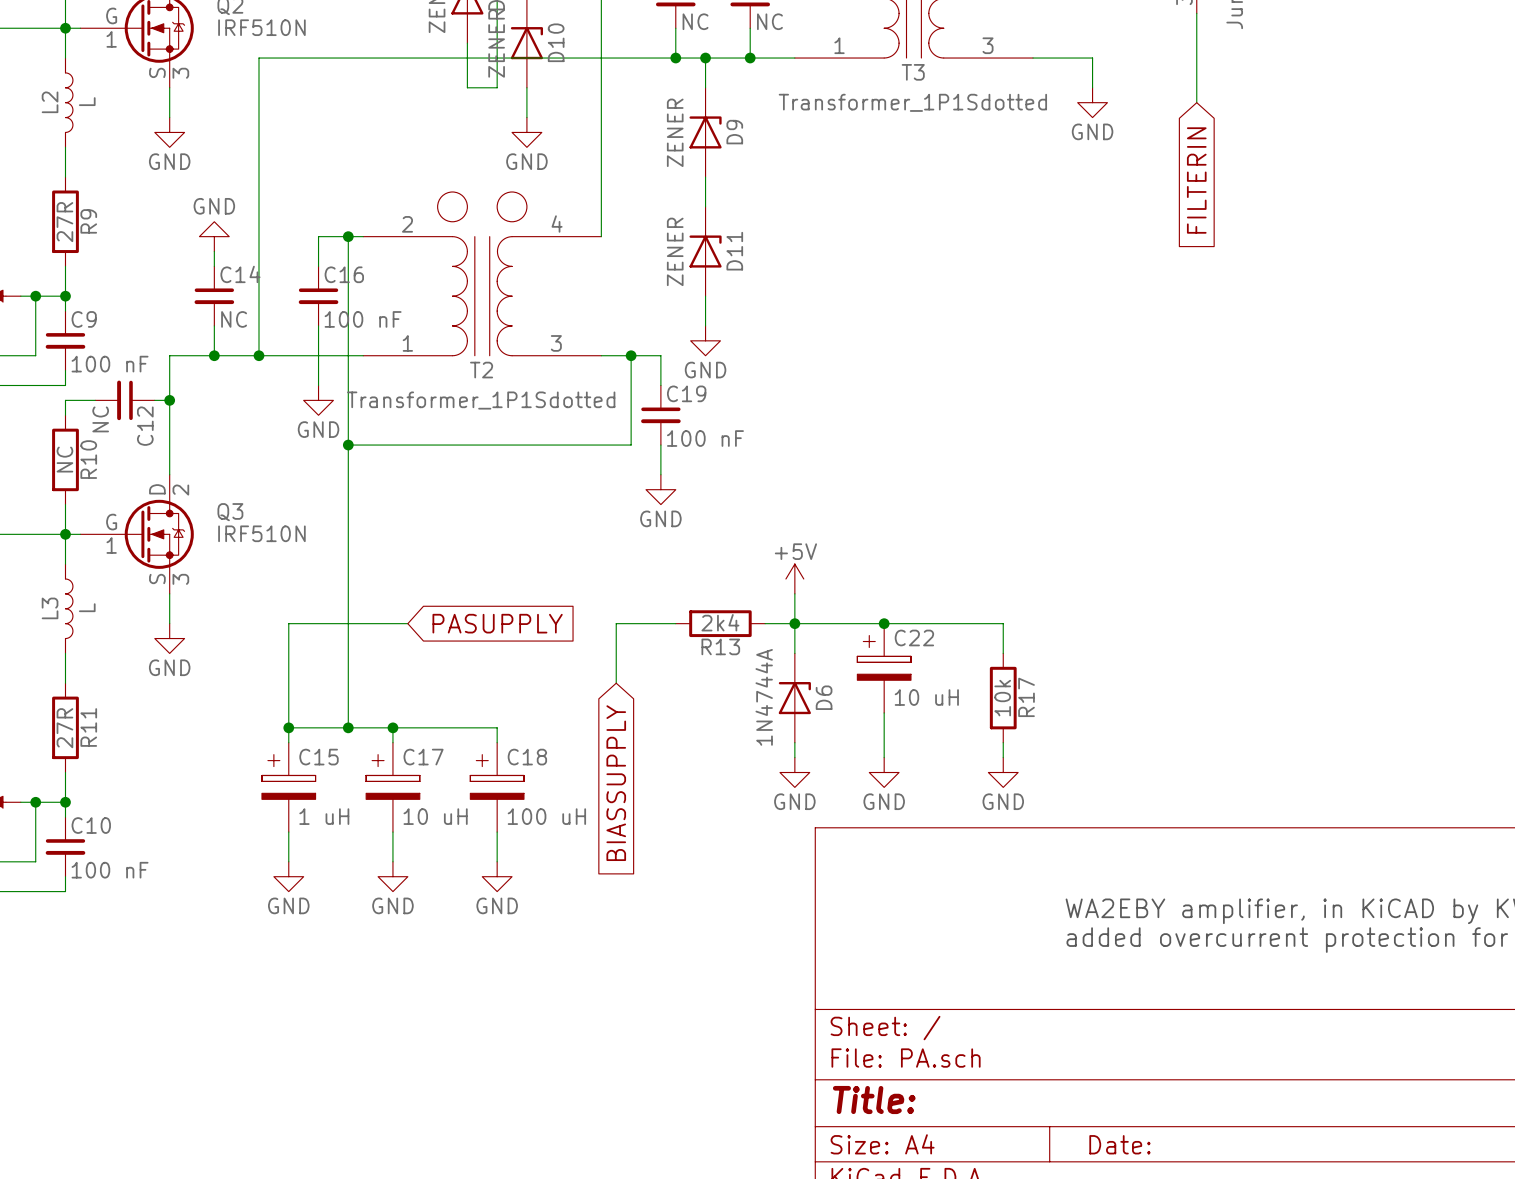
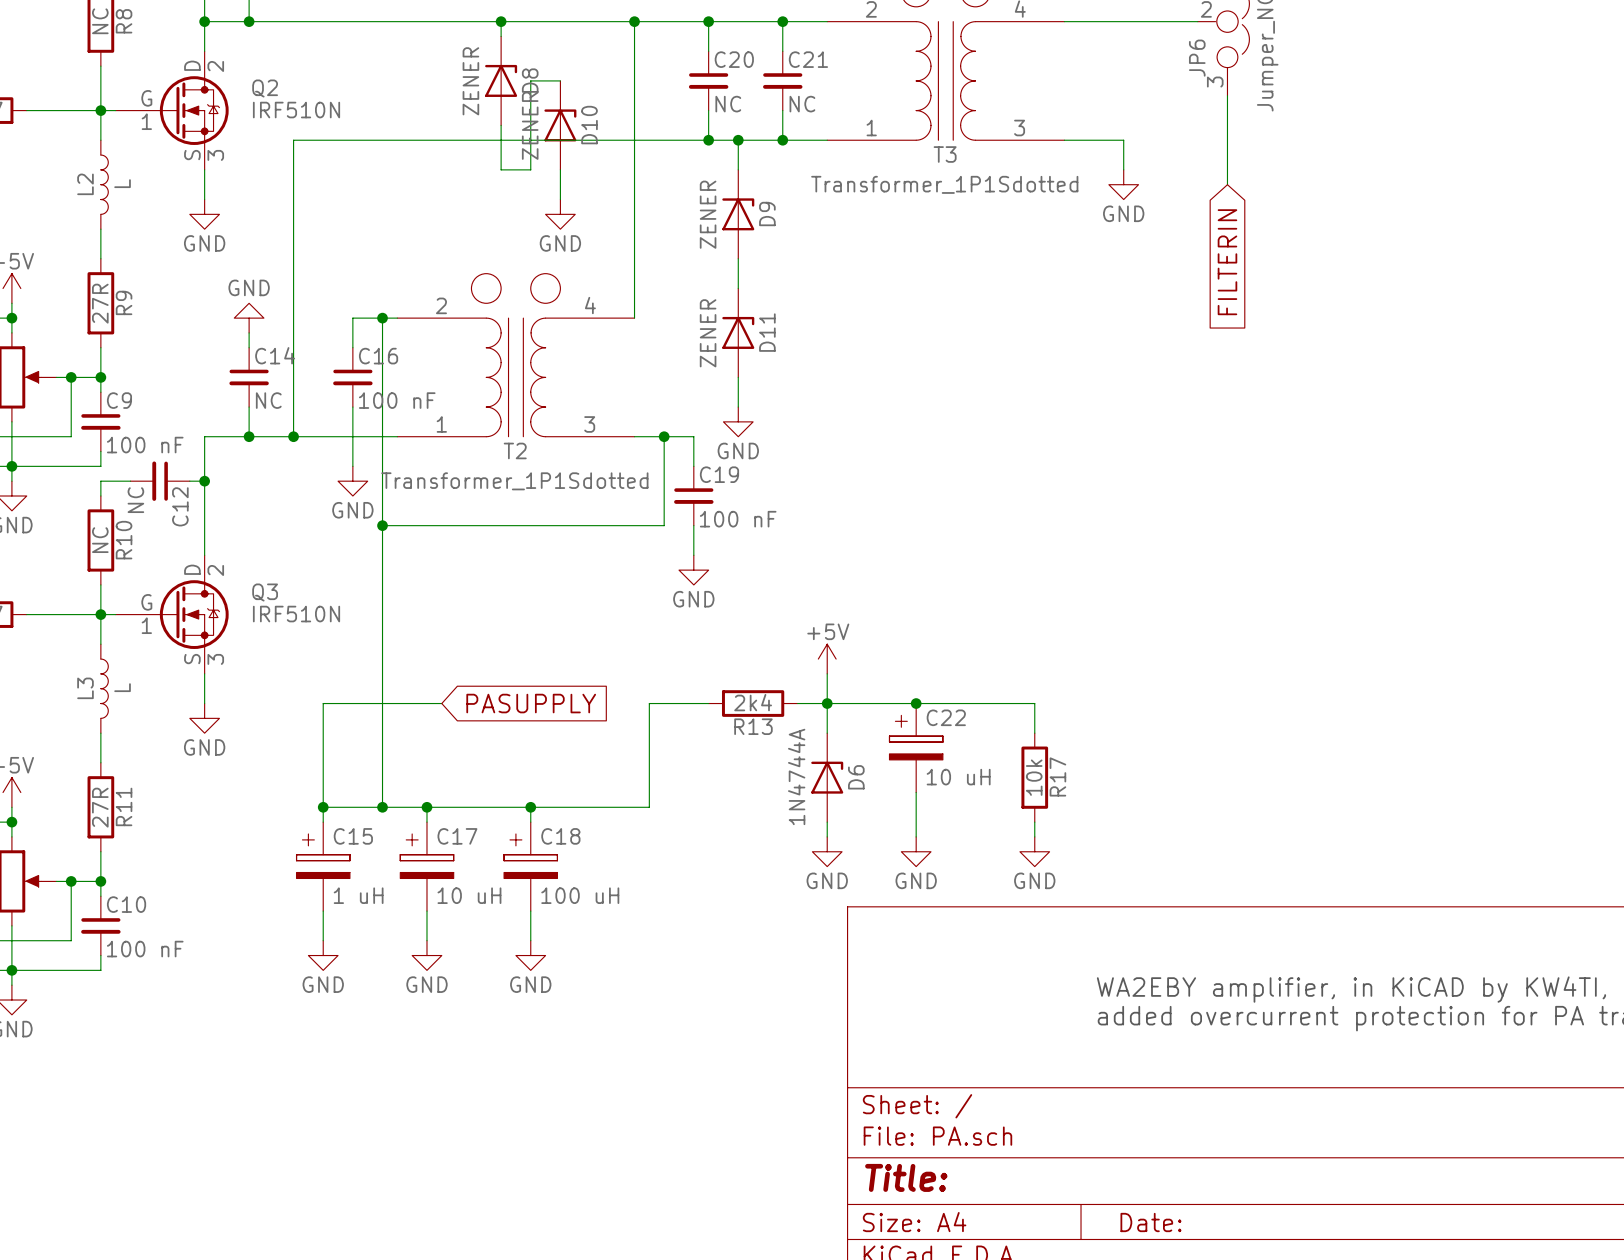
wire: none -> (649, 762) (649, 807) (530, 807)
junction: none -> (530, 807)
global label: BIASSUPPLY (616, 783) -> none

